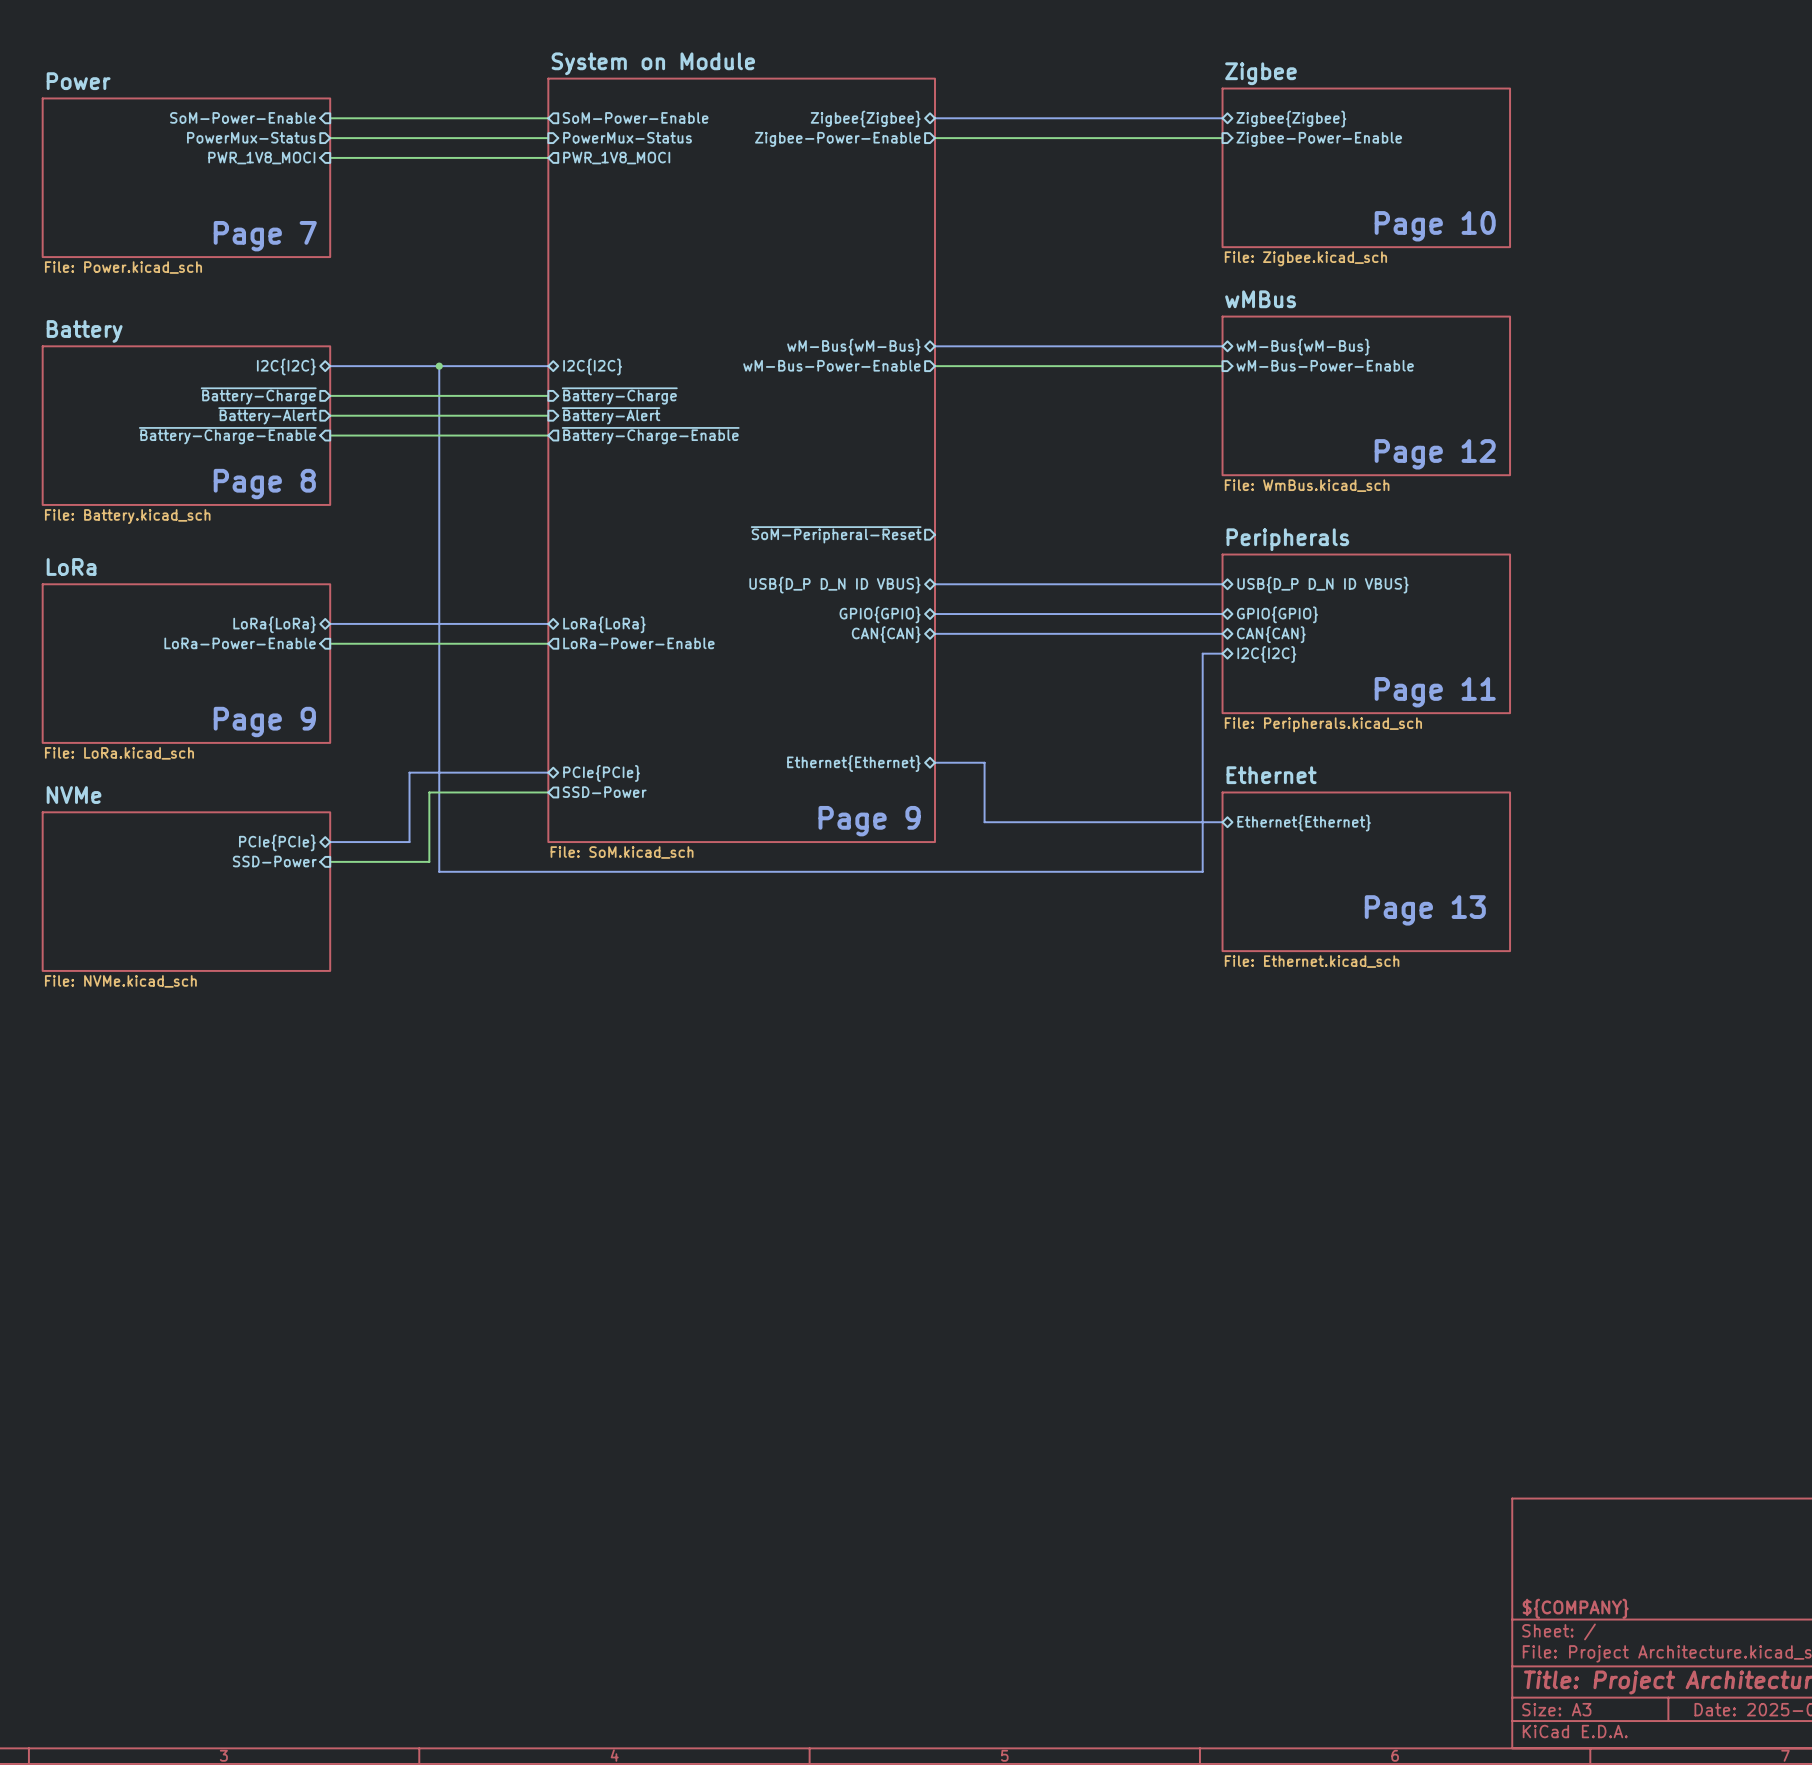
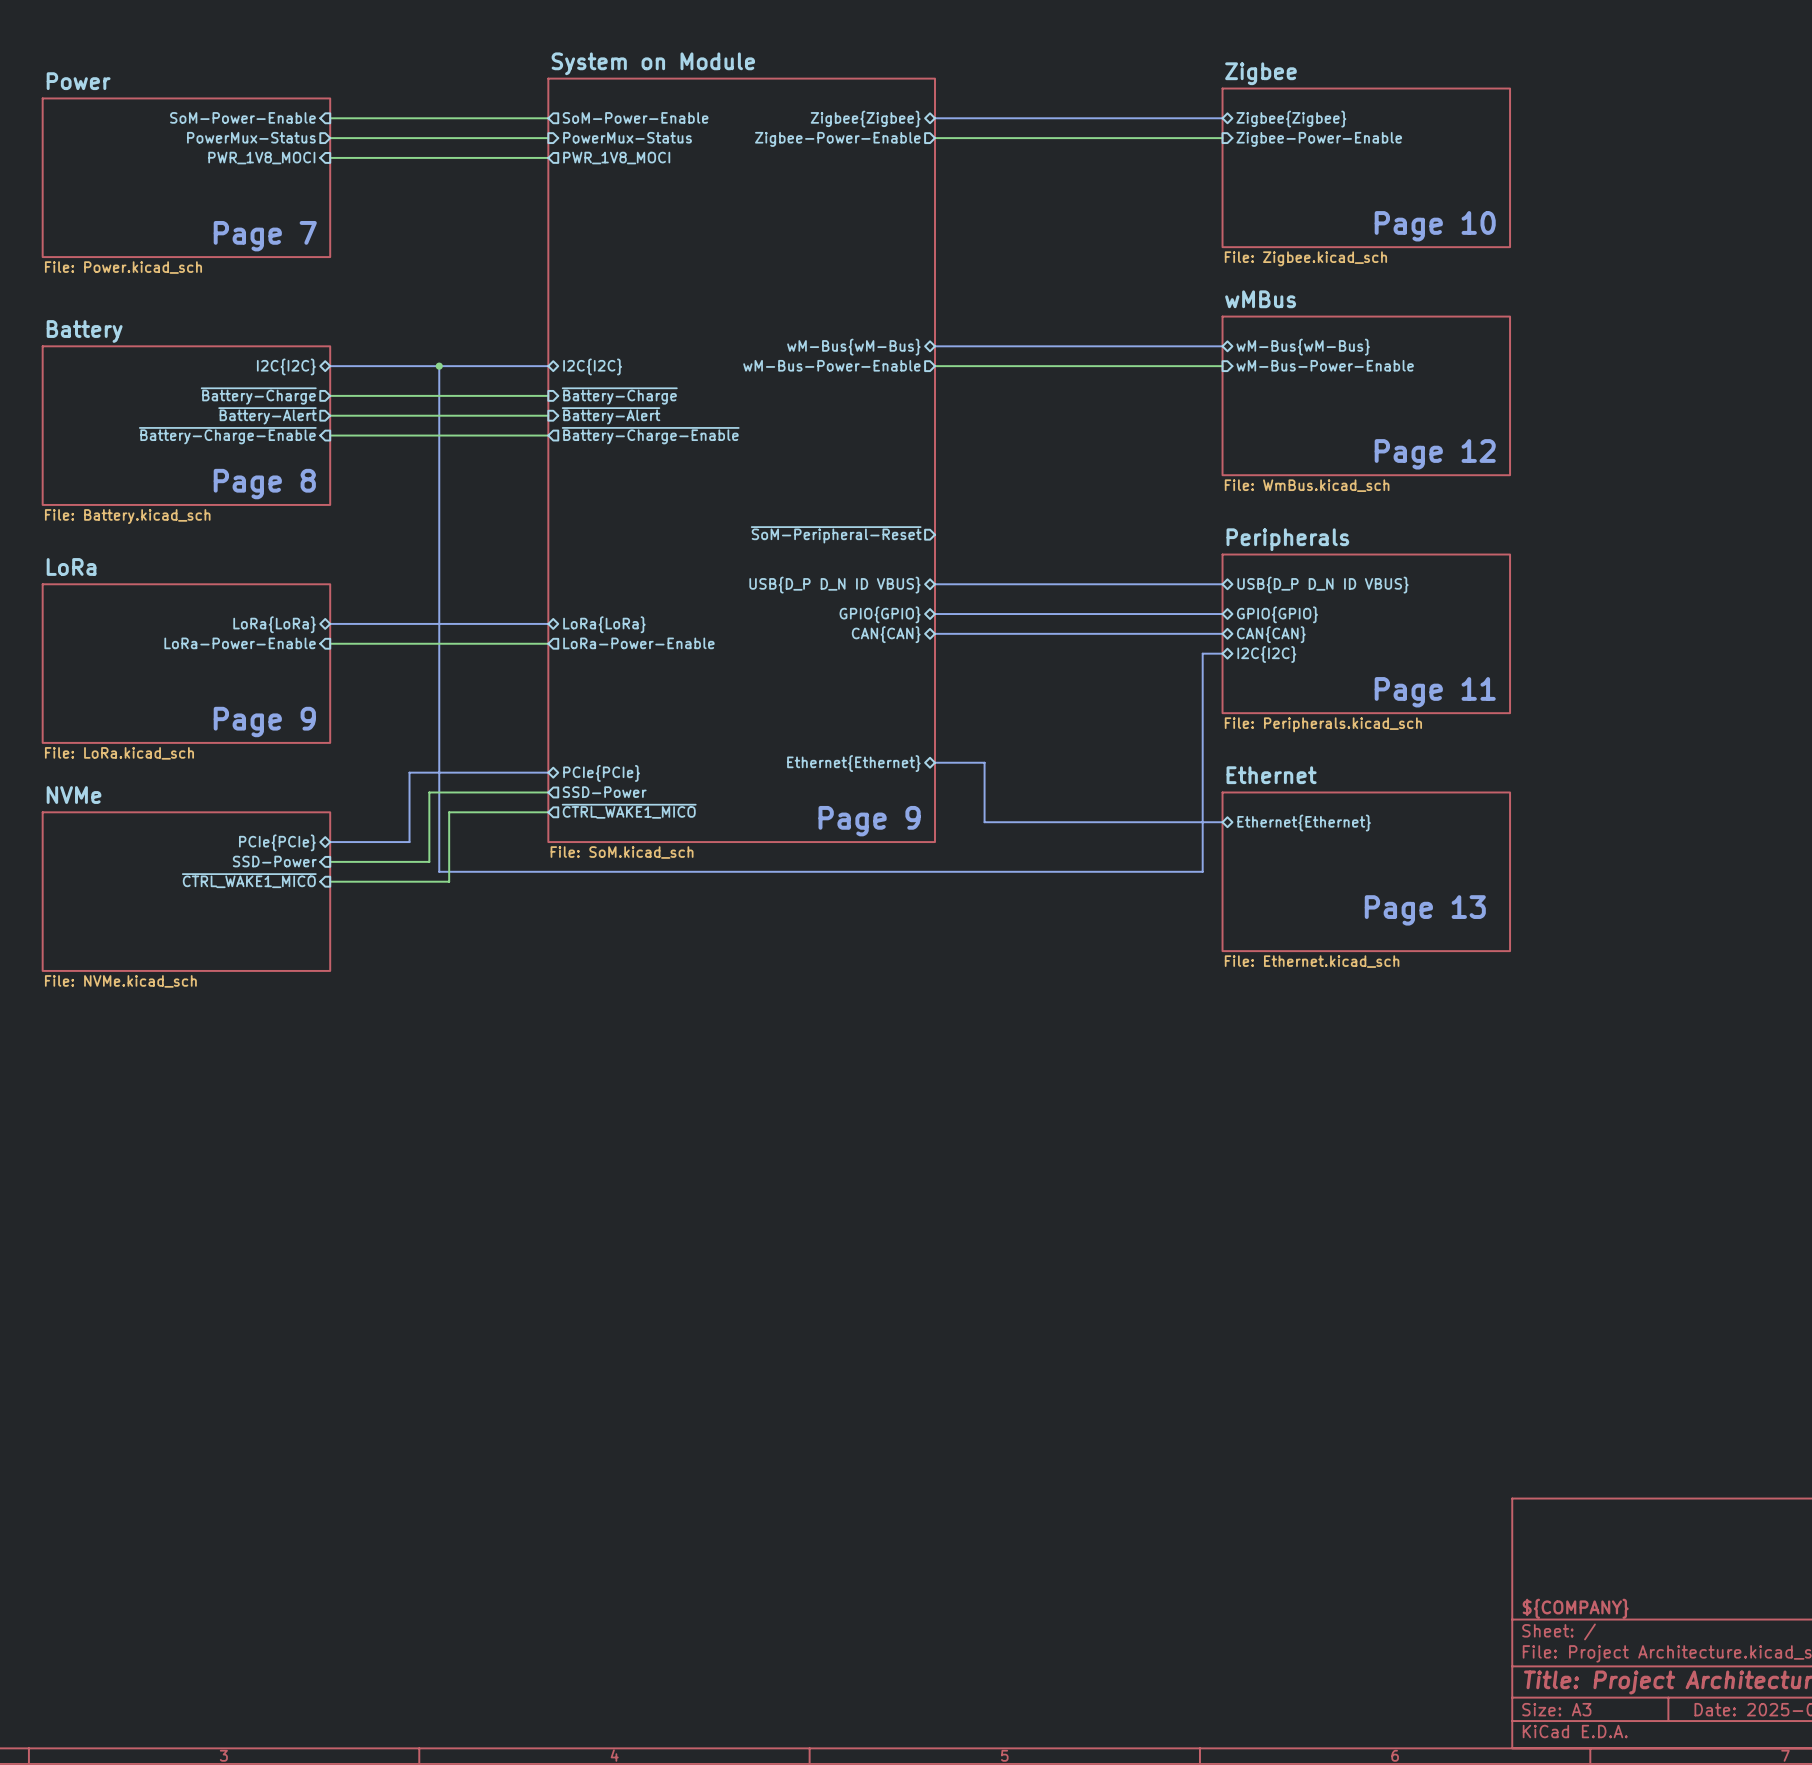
sheet pin: none -> ~{CTRL_WAKE1_MICO} (629, 811)
wire: none -> (548, 812) (449, 812) (449, 881) (330, 881)
sheet pin: none -> ~{CTRL_WAKE1_MICO} (249, 880)

